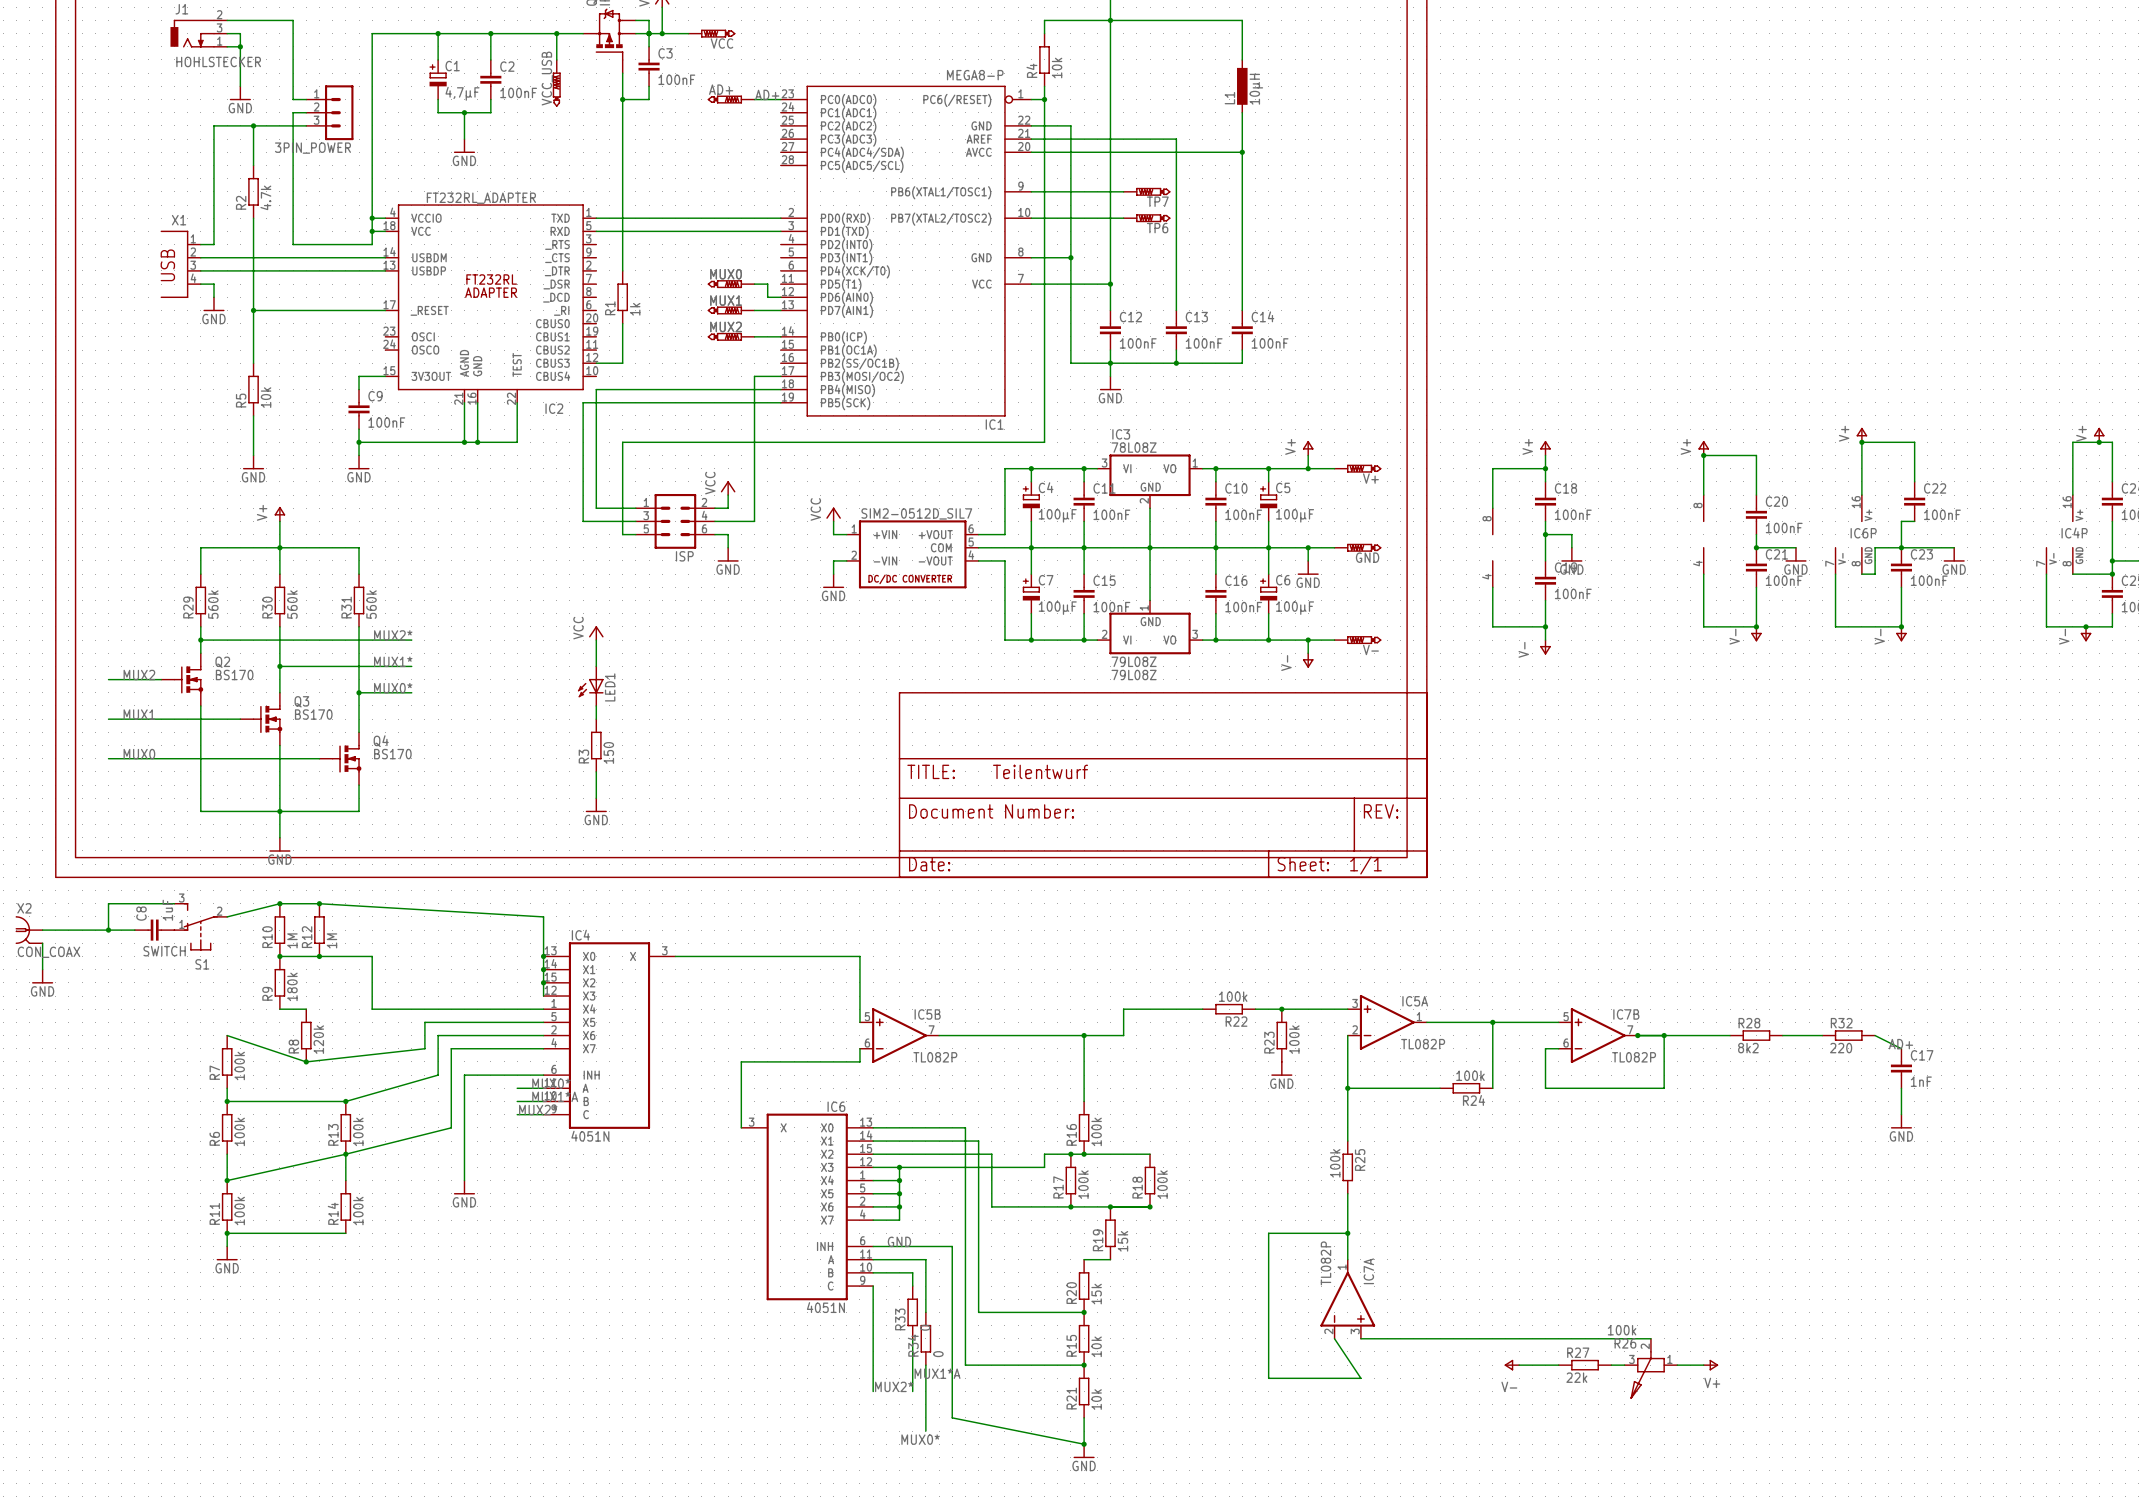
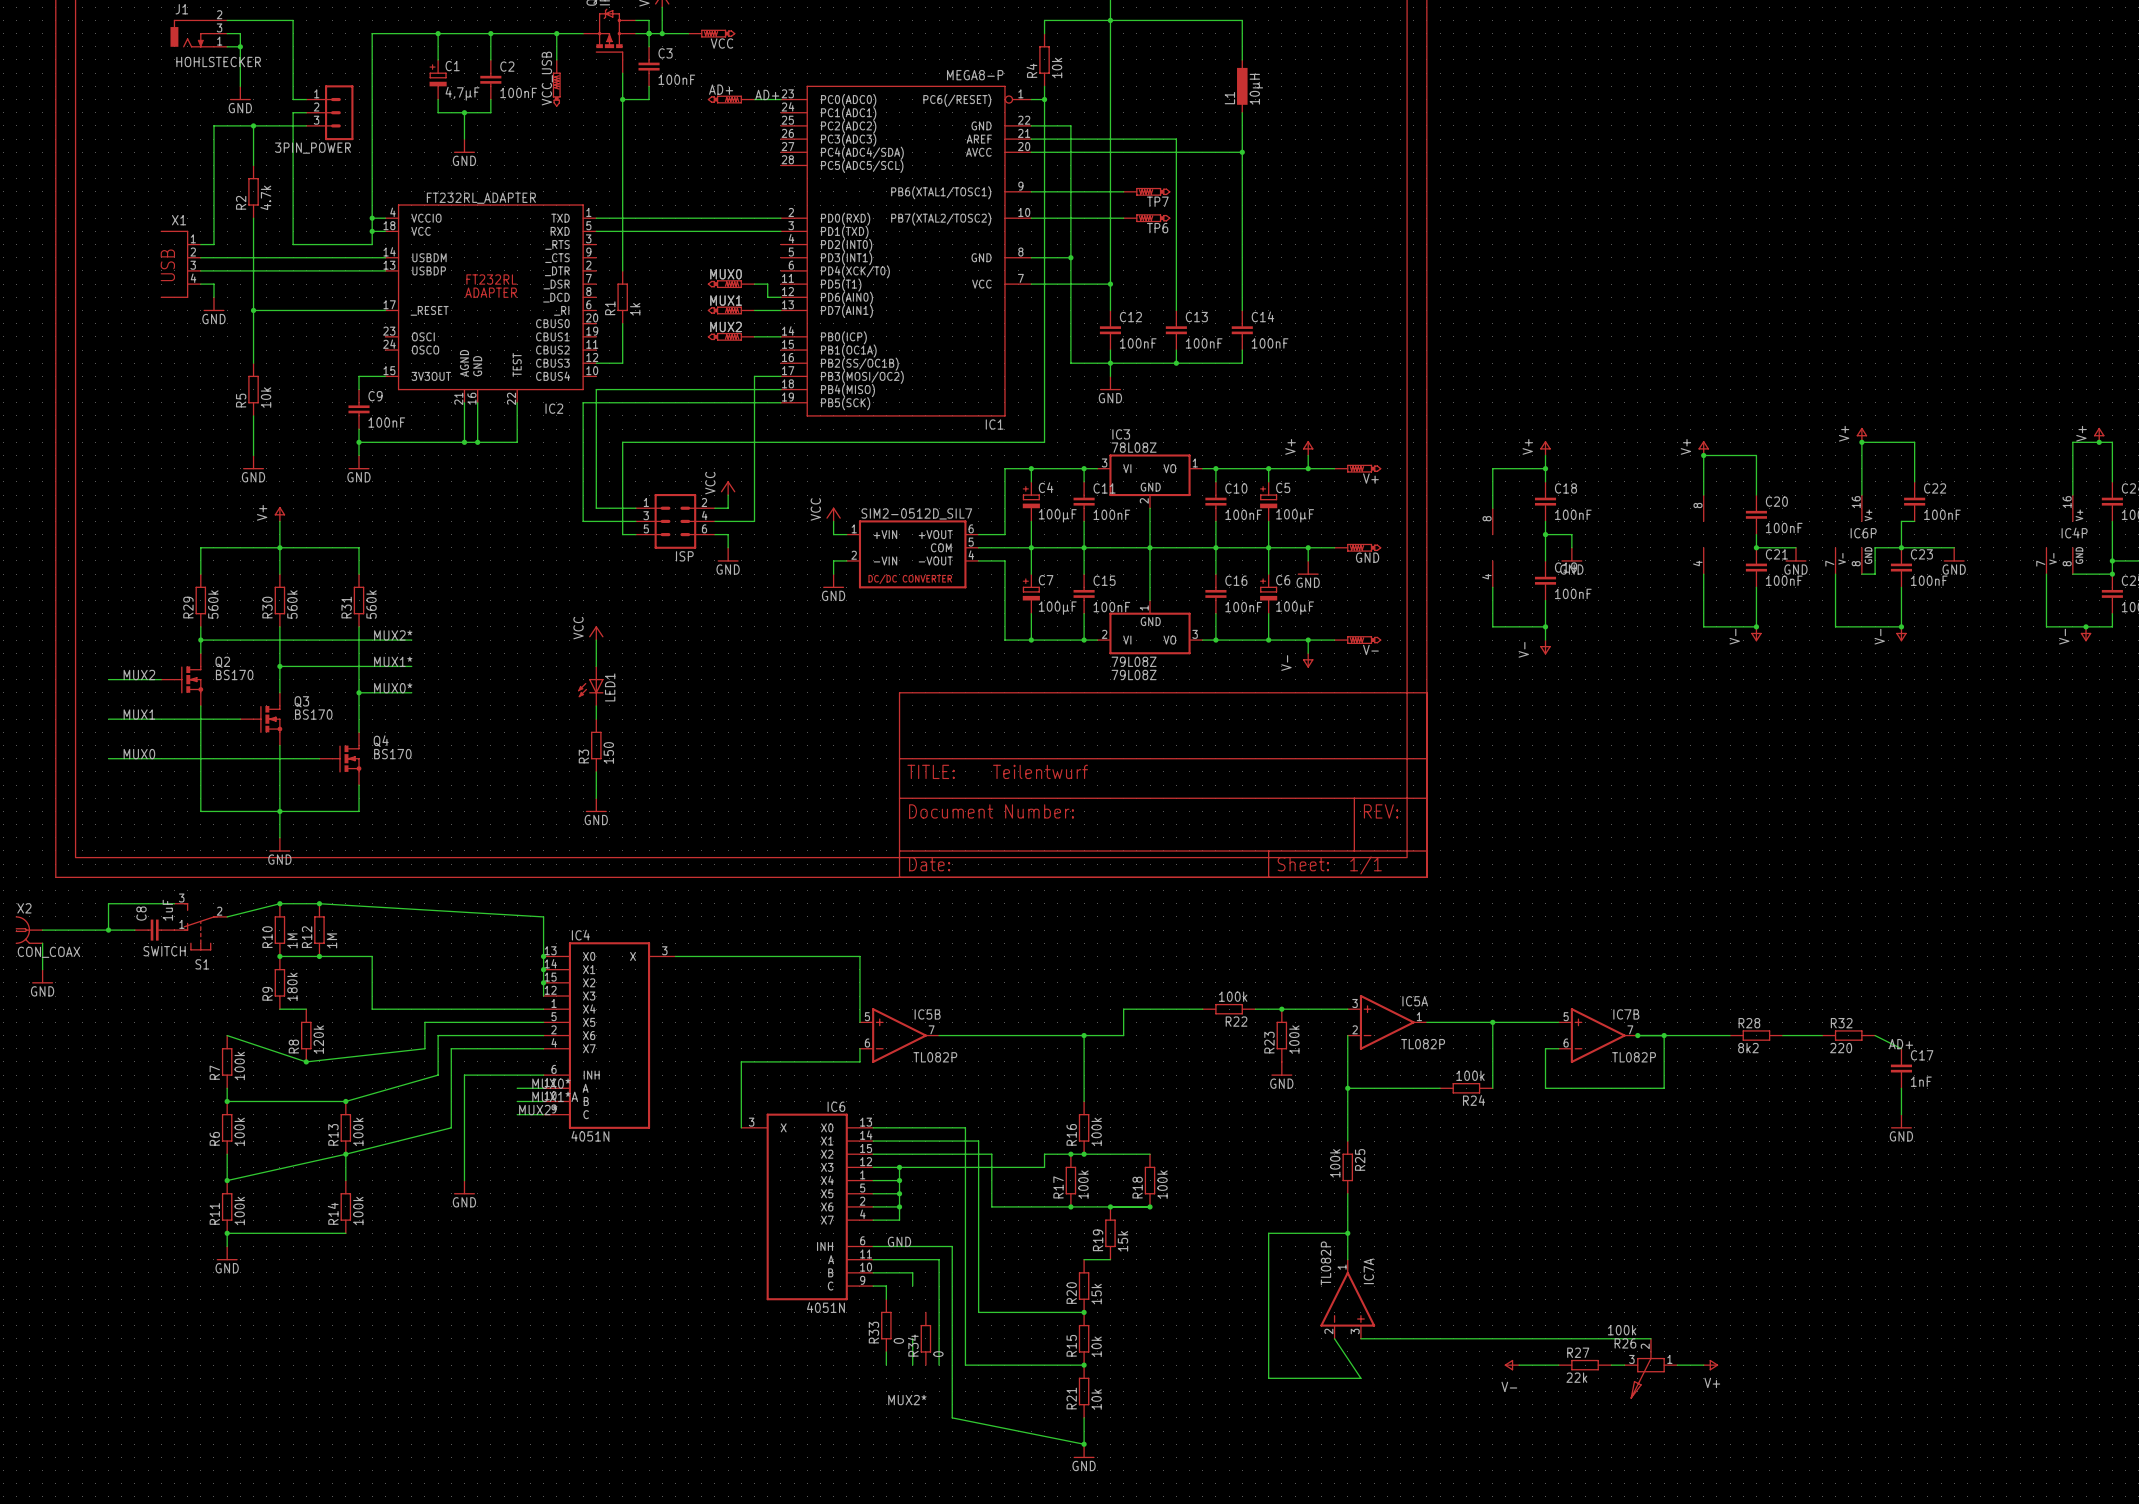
wire: (925, 1259) (925, 1312) -> (925, 1259) (939, 1259) (939, 1365)
wire: (873, 1286) (873, 1391) -> (873, 1286) (886, 1286) (886, 1299)
R33 position: (912, 1312) -> (886, 1325)
wire: none -> (886, 1351) (886, 1365)
wire: (912, 1365) (912, 1391) -> none
wire: (925, 1365) (925, 1431) -> none
label: MUX1*A (937, 1373) -> none
label position: MUX2* (894, 1386) -> MUX2* (907, 1400)
label: MUX0* (920, 1439) -> none

